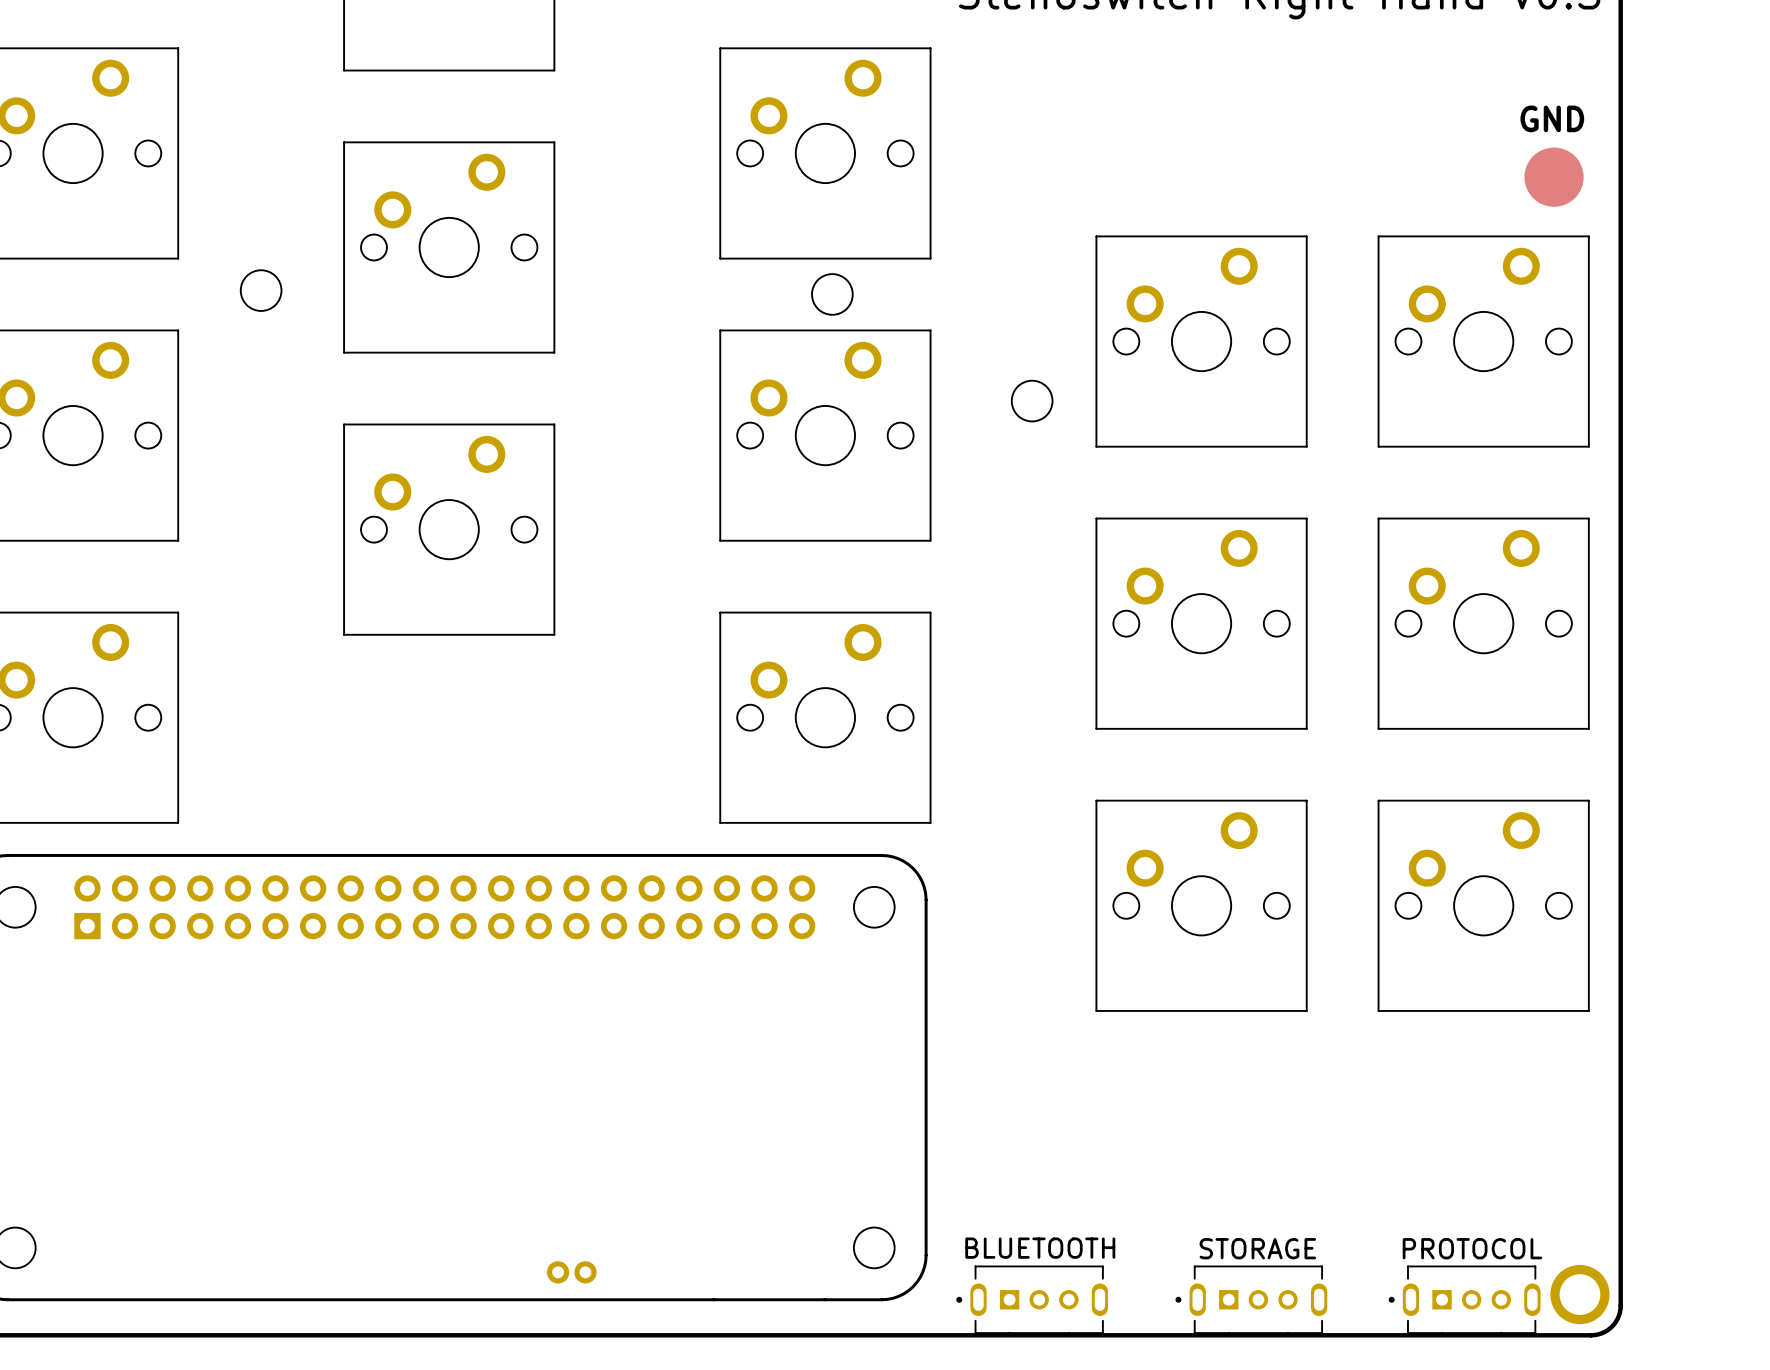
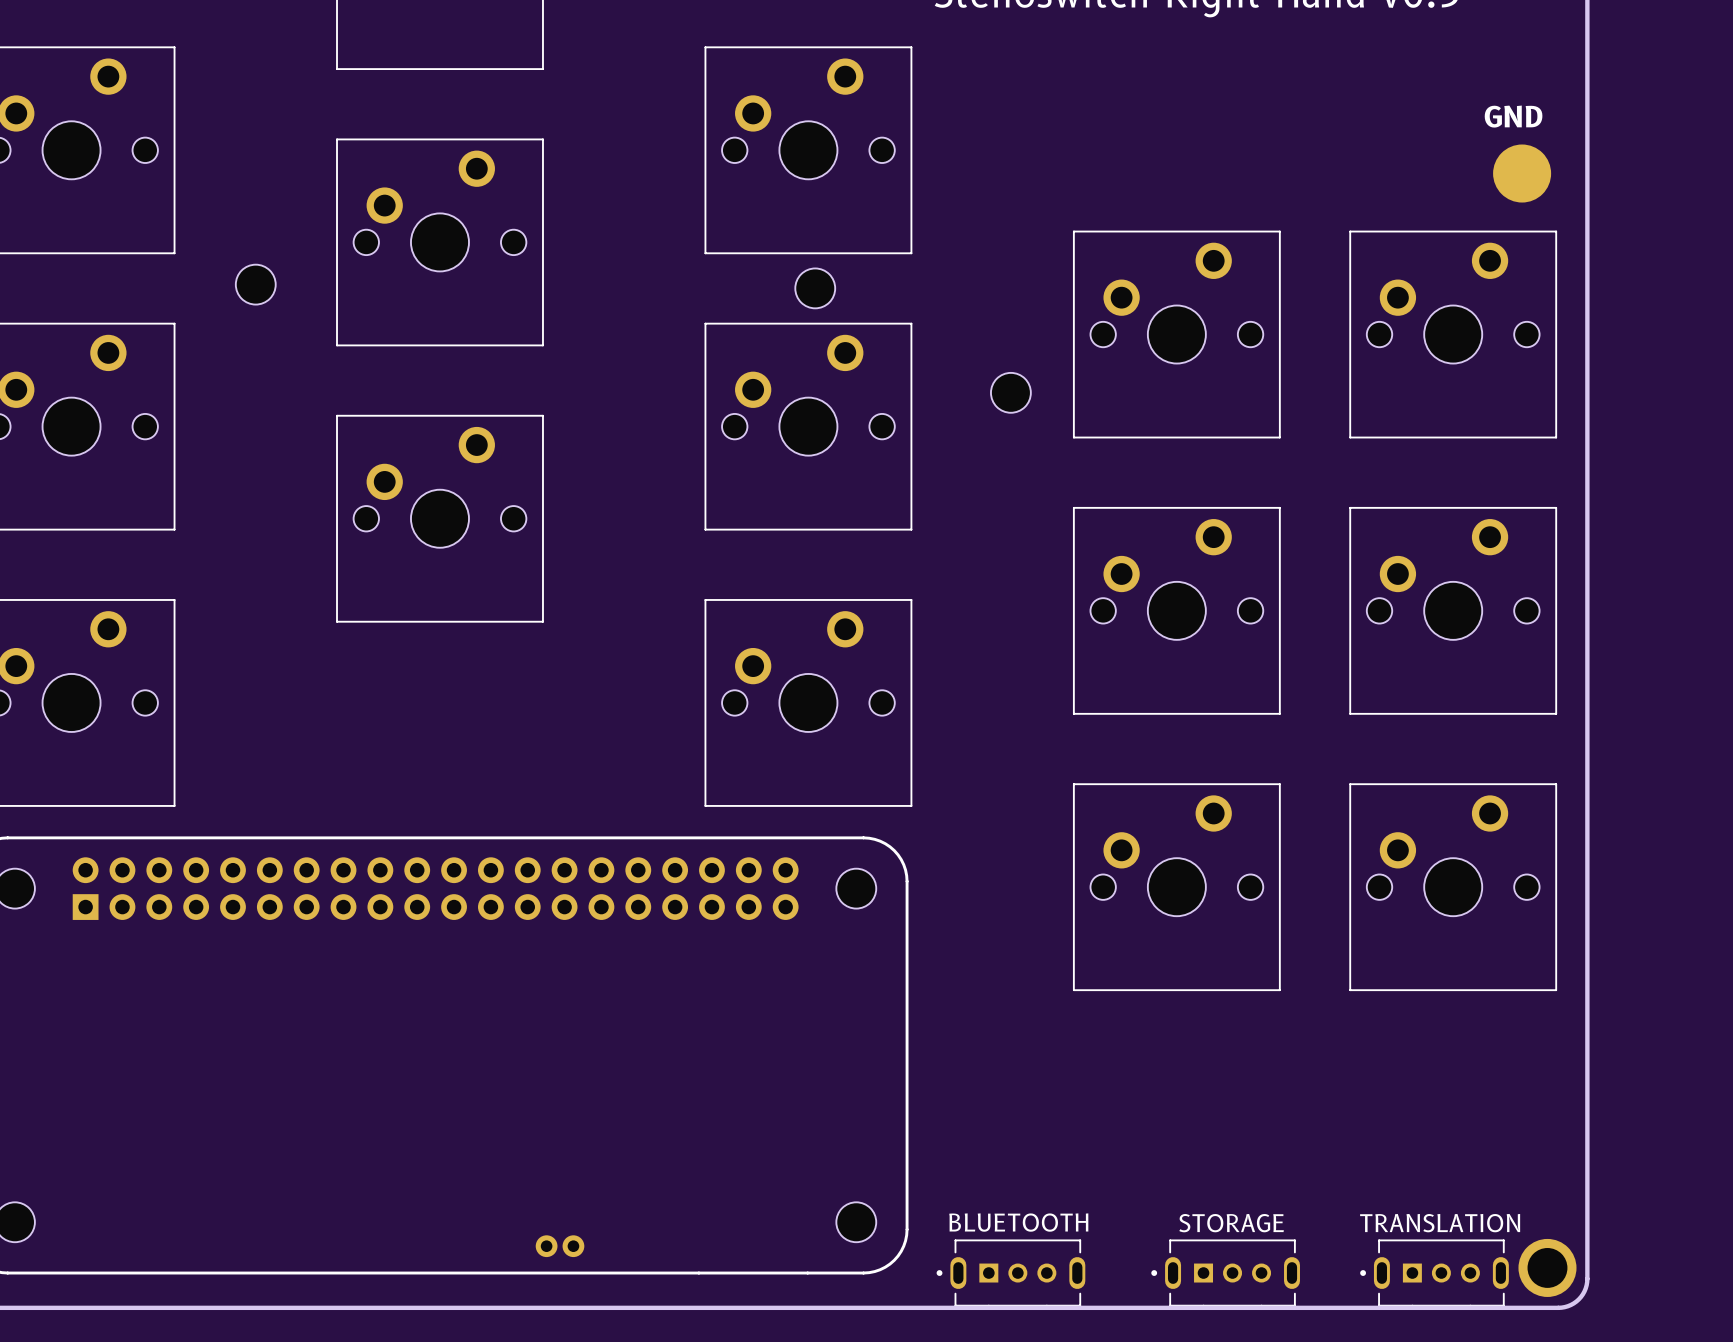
PROTOCOL name: PROTOCOL (1472, 1248) -> TRANSLATION (1440, 1223)

